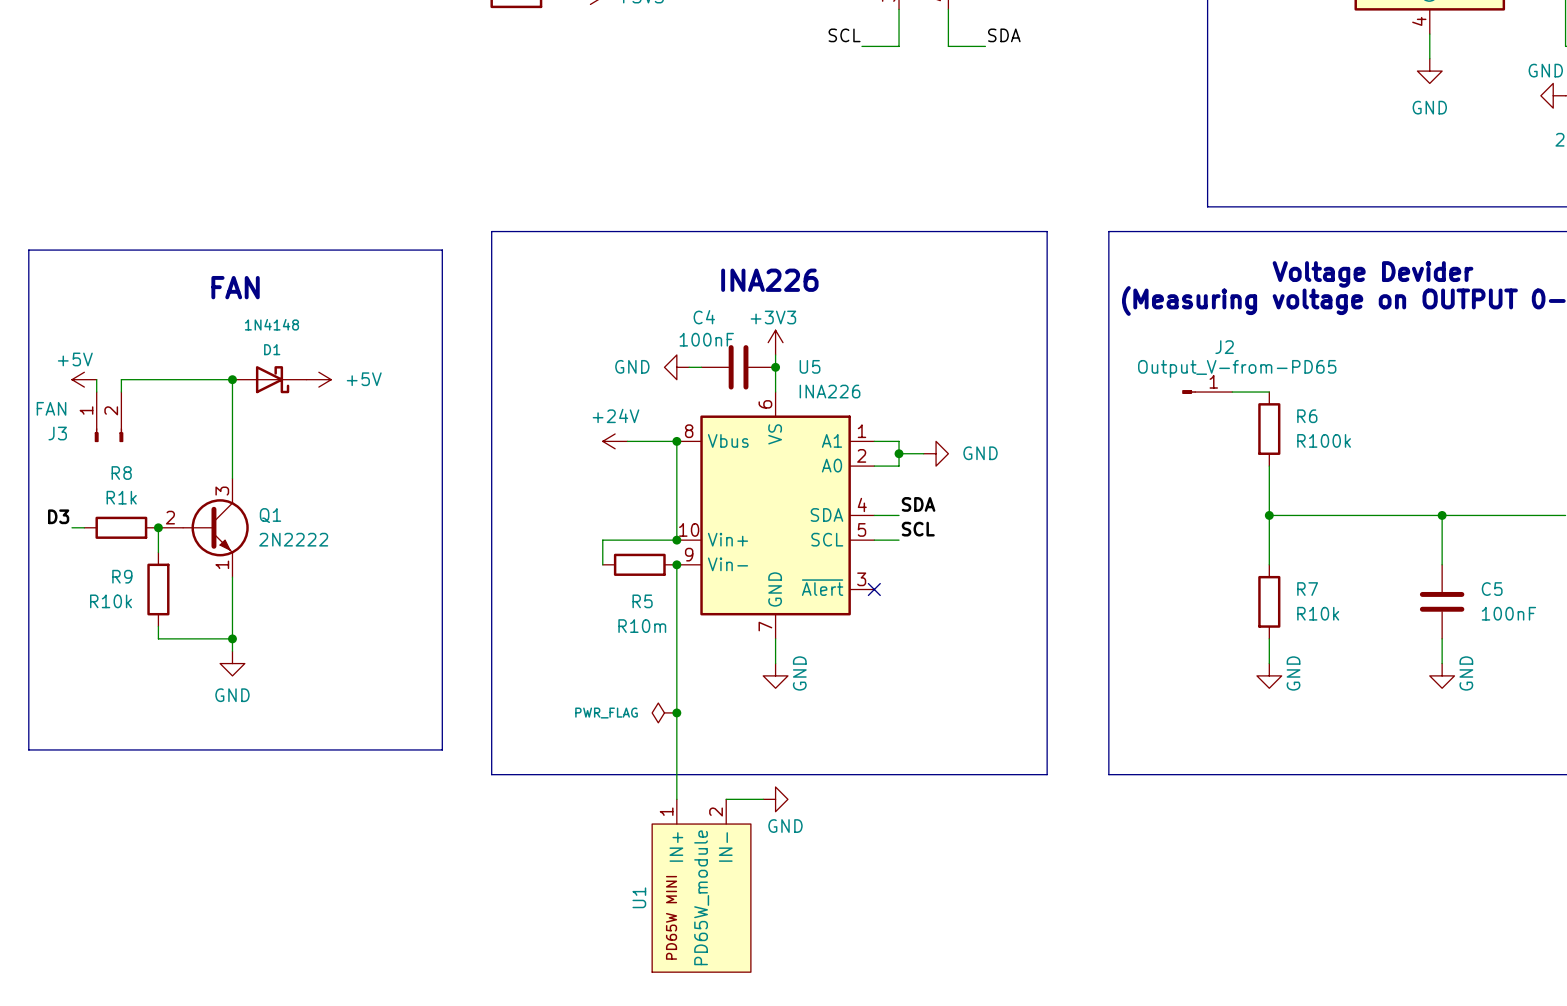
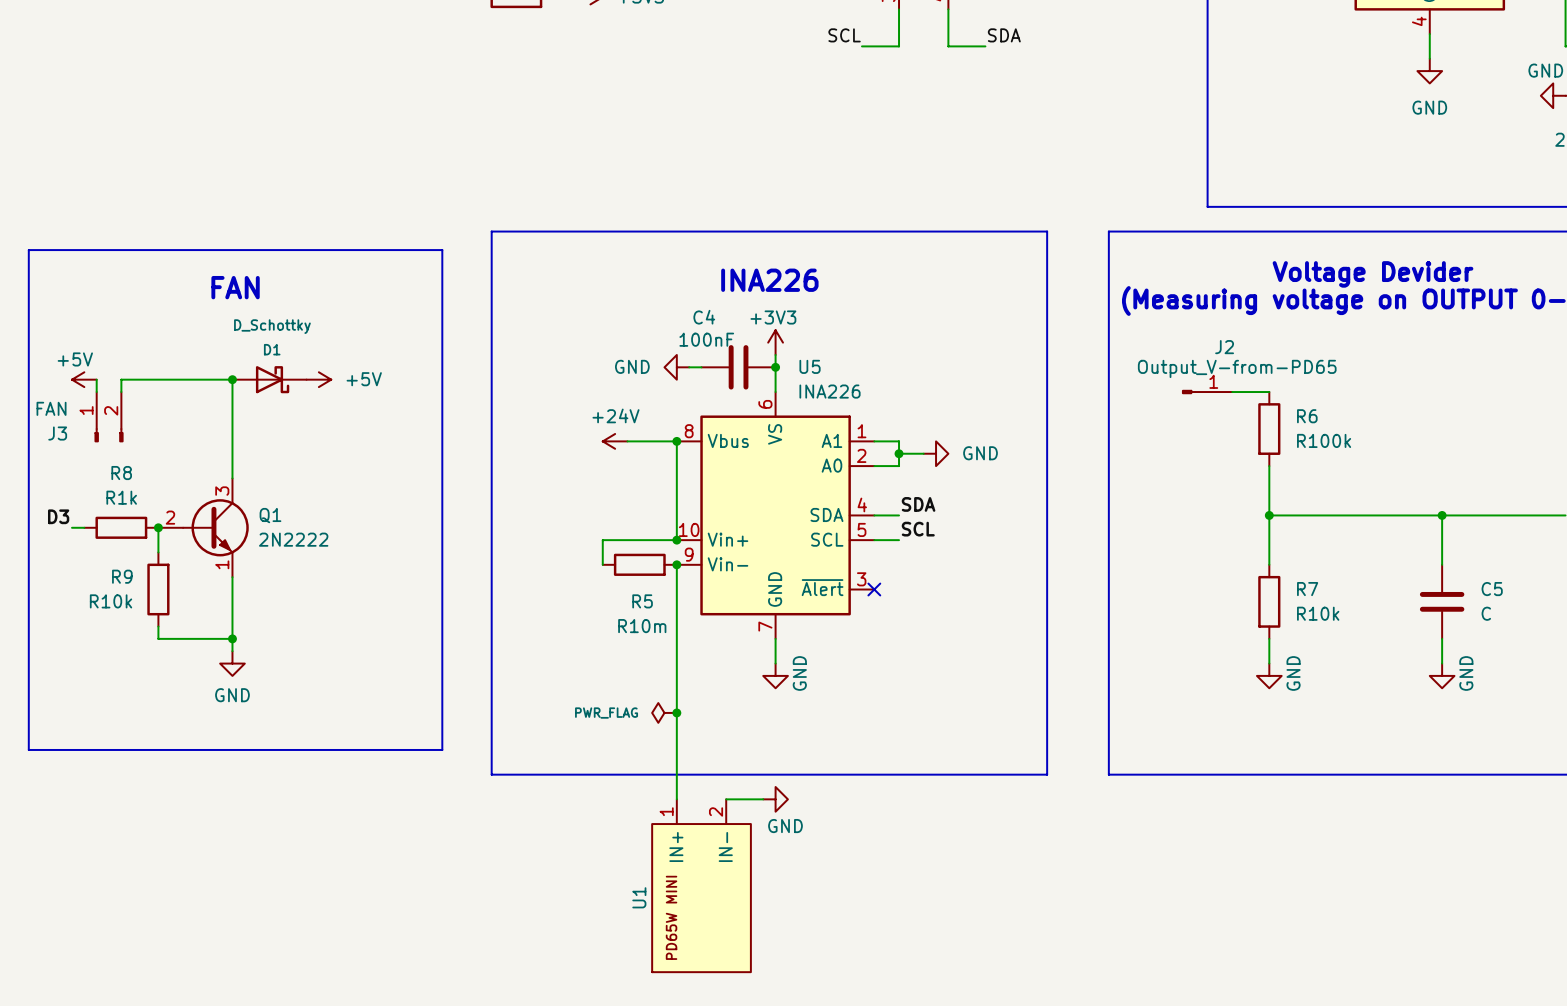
D1 value: 1N4148 (271, 324) -> D_Schottky (272, 326)
C5 value: 100nF (1508, 613) -> C (1486, 613)
U1 value: PD65W_module (701, 897) -> none

